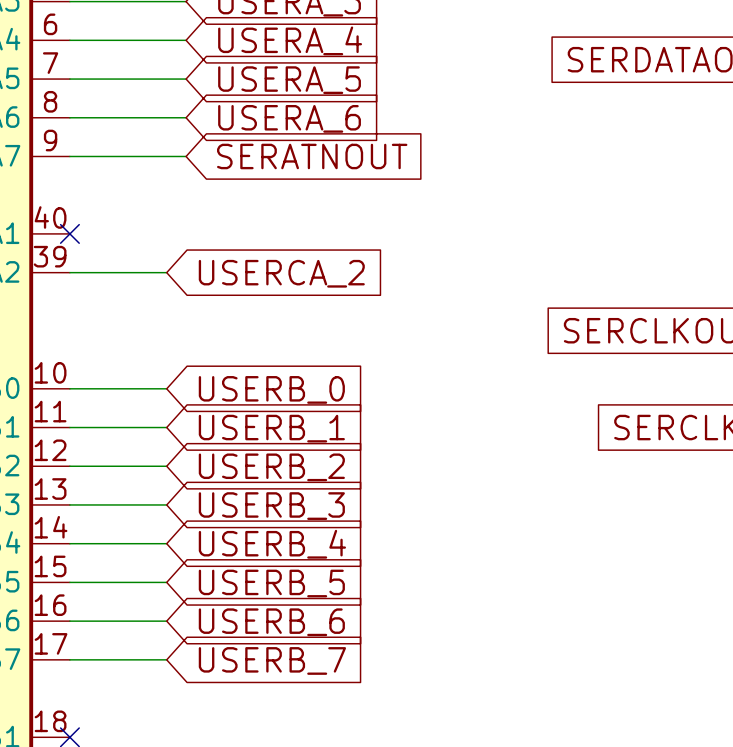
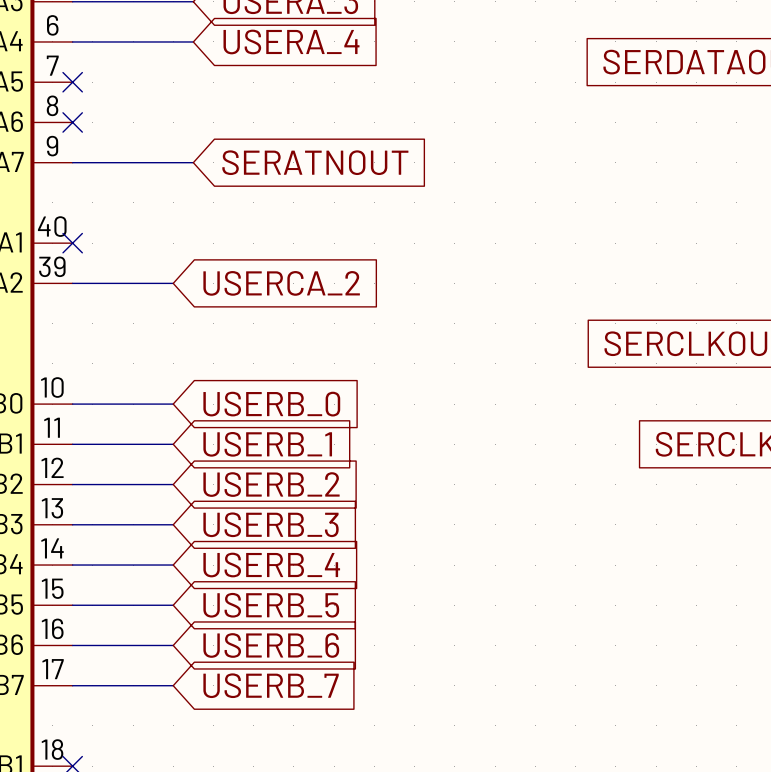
wire: (69, 79) (186, 79) -> none
no-connect mark: none -> (72, 82)
global label: USERA_5 (289, 80) -> none
wire: (69, 117) (186, 117) -> none
no-connect mark: none -> (72, 122)
global label: USERA_6 (289, 118) -> none

